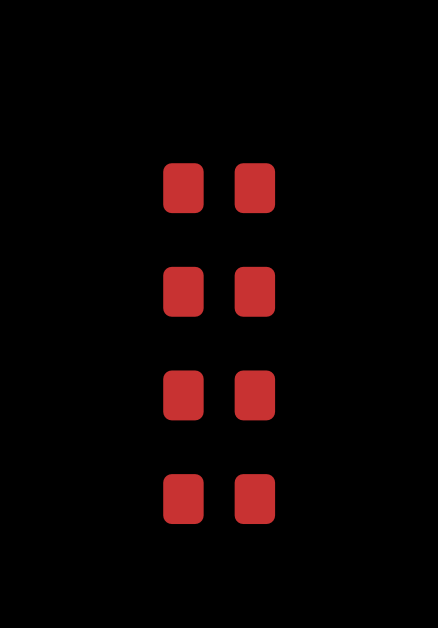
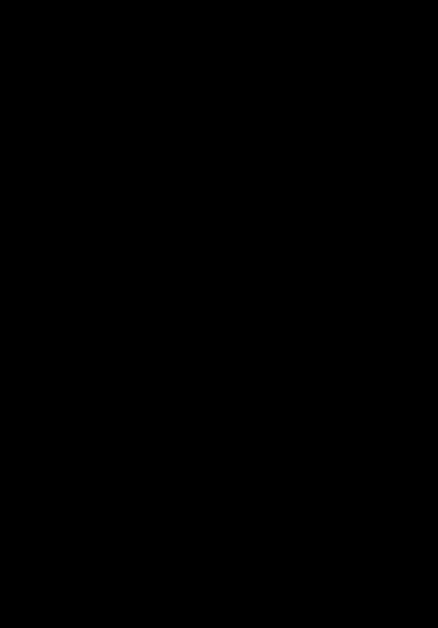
part: (219, 188) -> none
part: (219, 291) -> none
part: (219, 395) -> none
part: (219, 499) -> none

